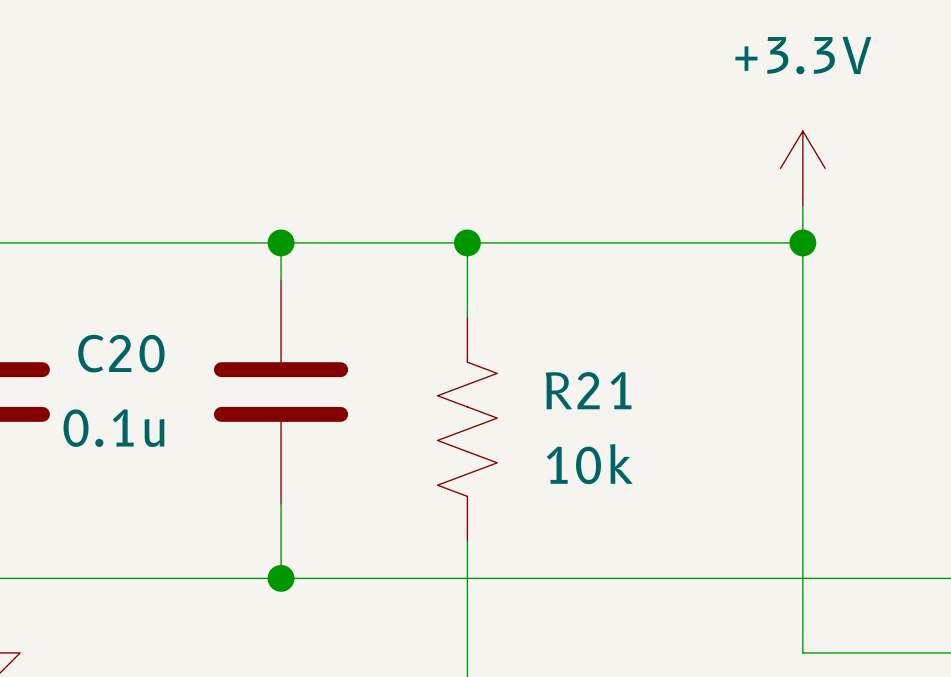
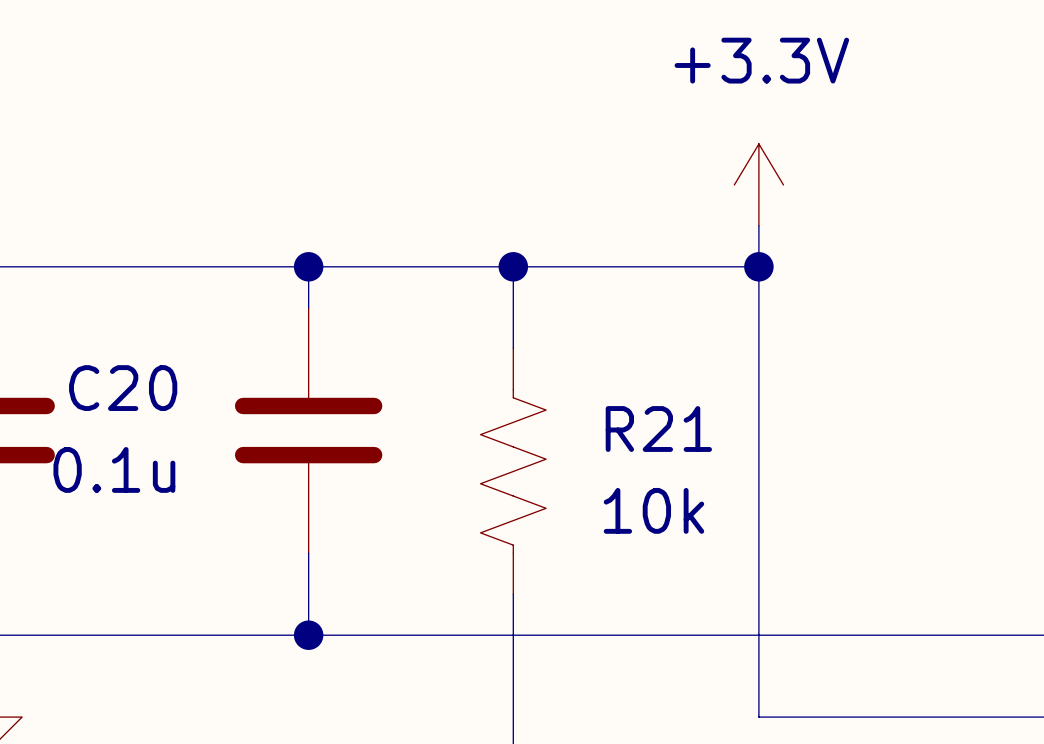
power symbol position: +3.3V (802, 168) -> +3.3V (758, 184)
wire: (802, 205) (802, 652) -> (758, 225) (758, 717) (881, 717)
wire: (691, 242) (802, 242) -> none
junction position: (802, 242) -> (758, 266)

